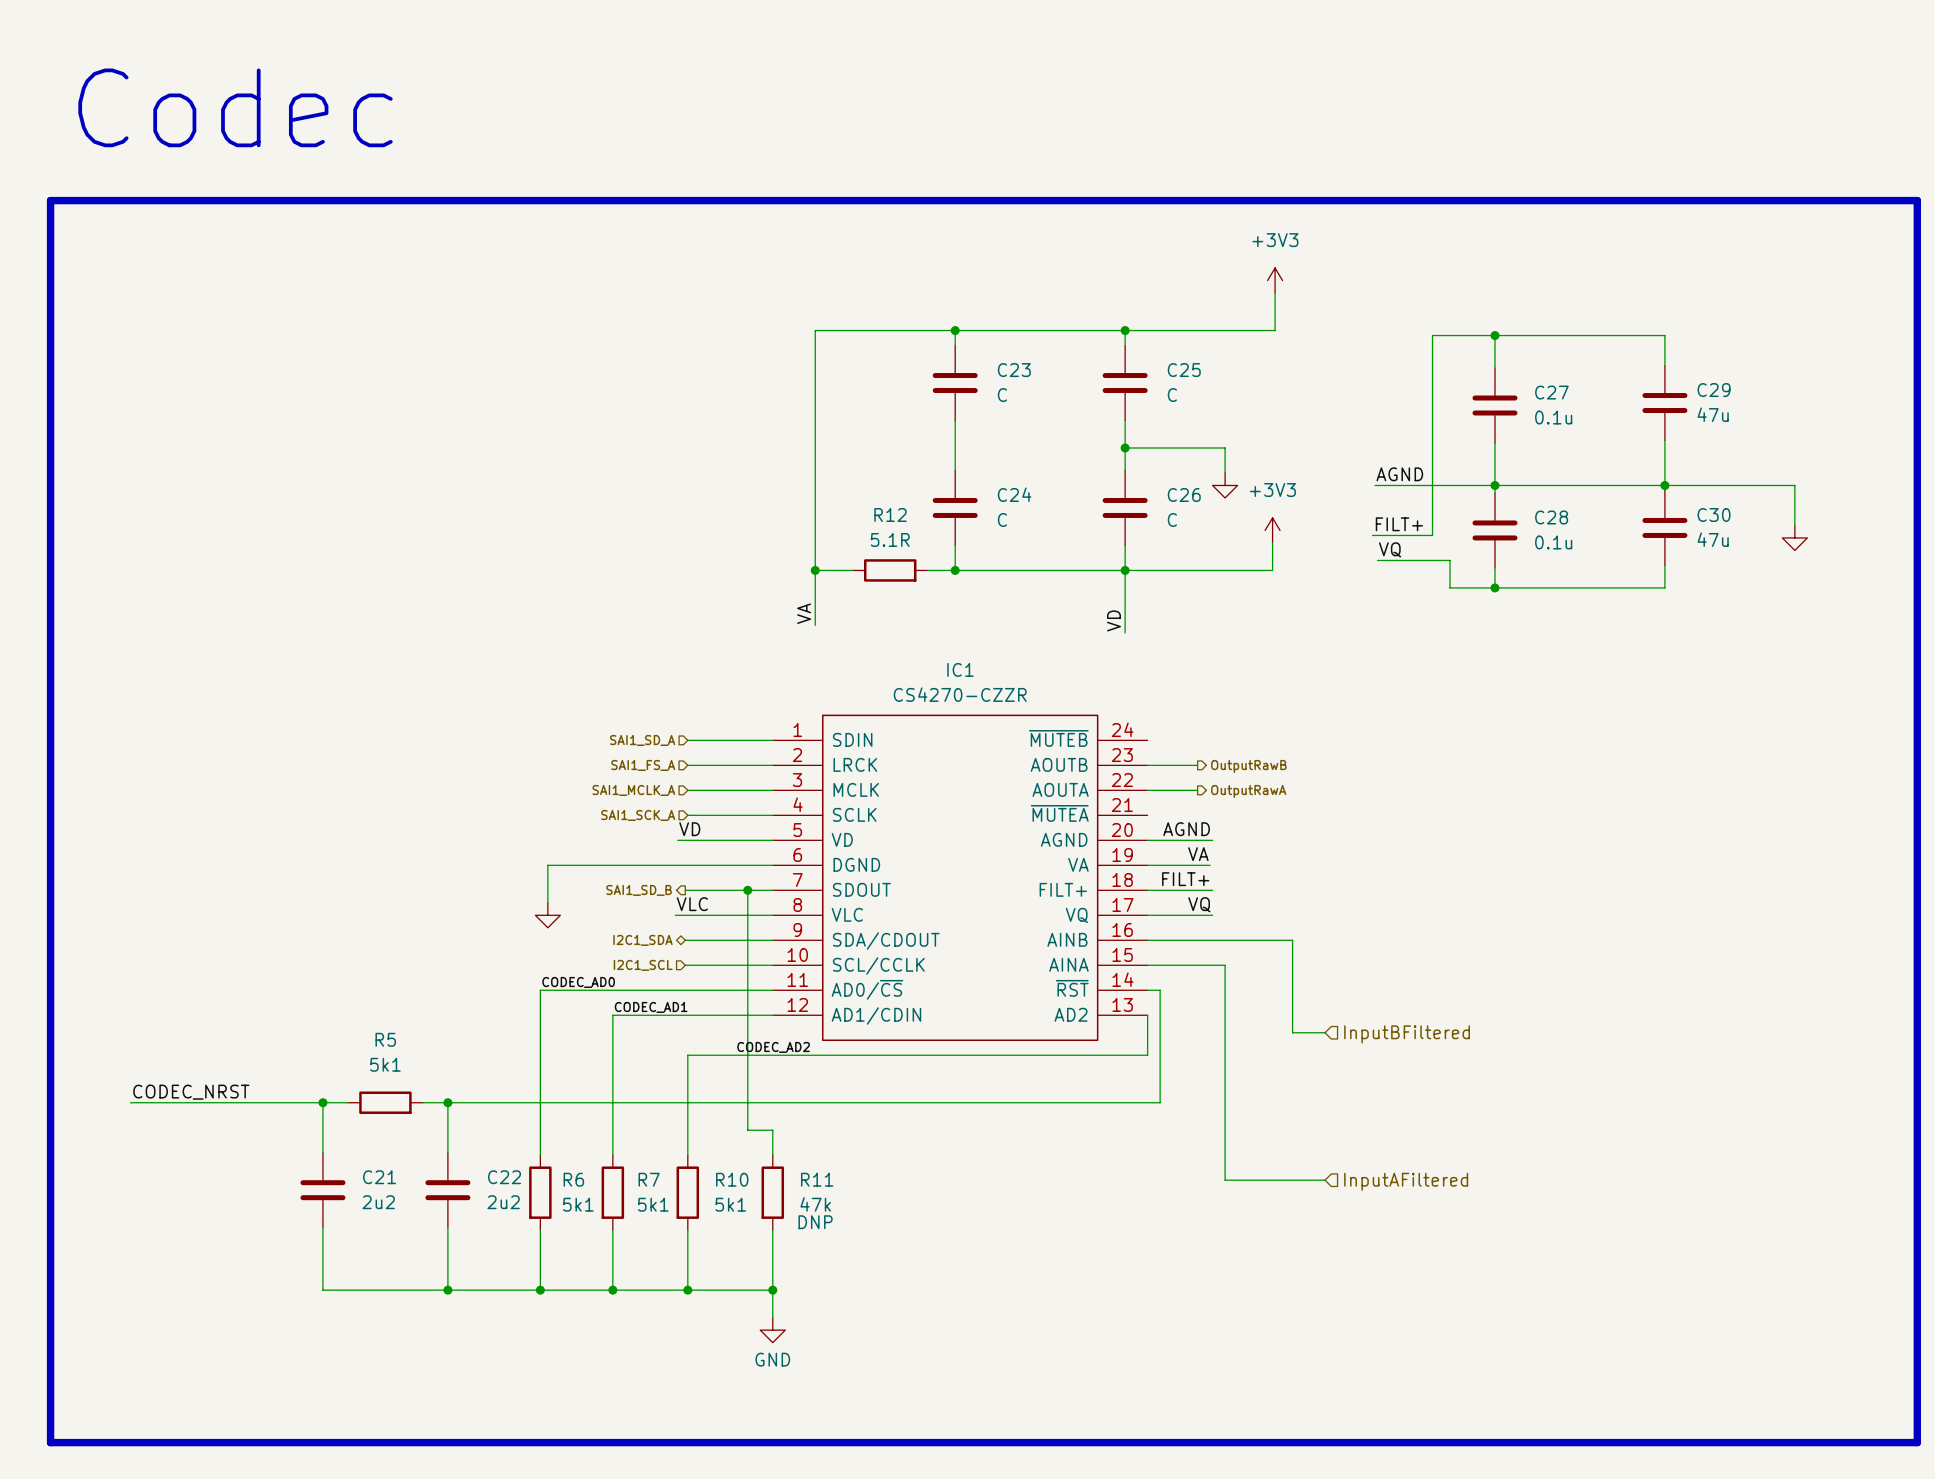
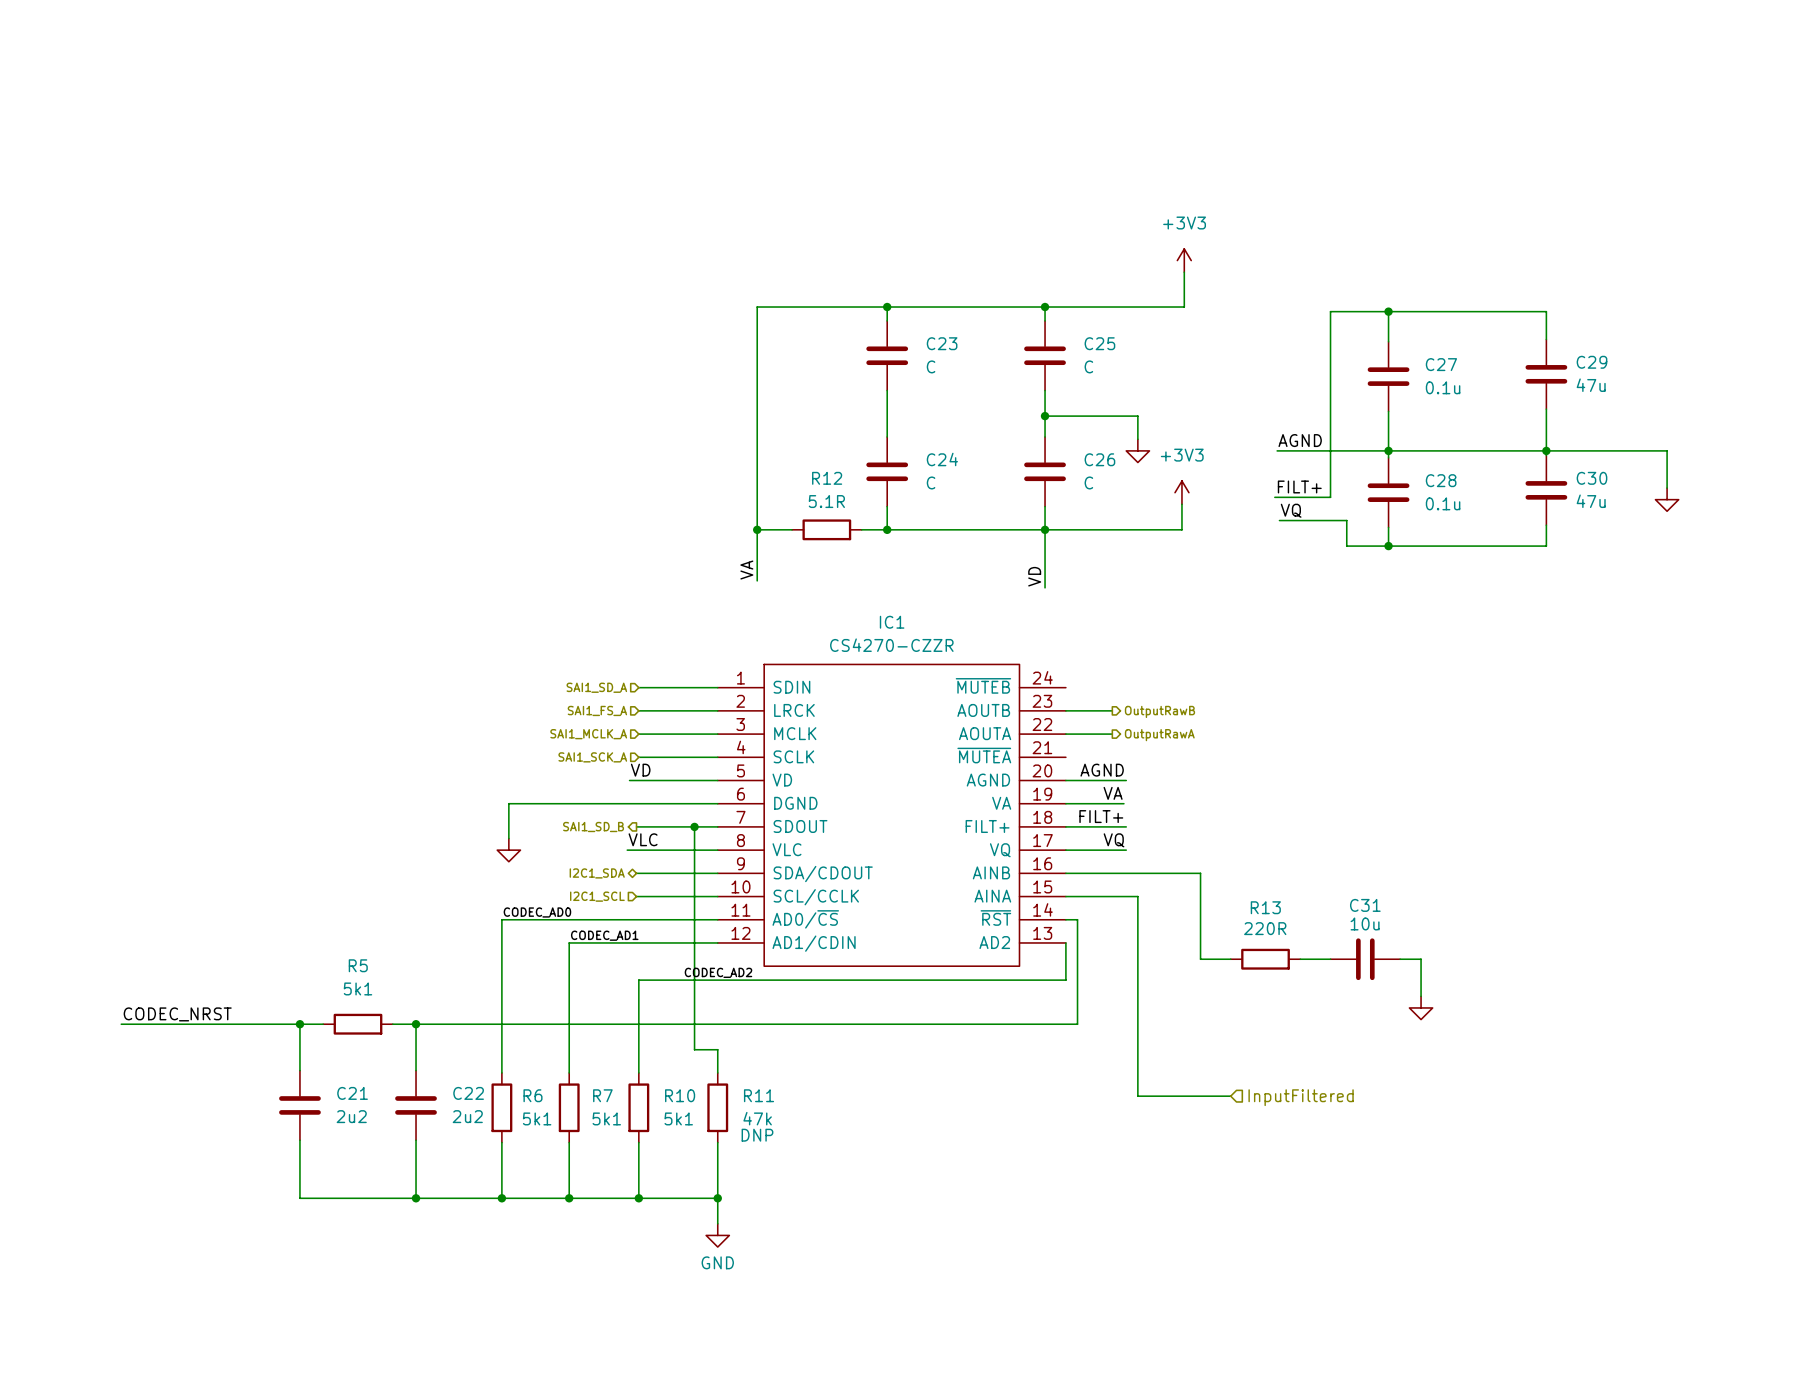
text: Codec (235, 107) -> none
line: (50, 200) (1917, 200) (1917, 1442) (50, 1442) (50, 200) -> none
R13: none -> 220R (1265, 959)
wire: none -> (1300, 959) (1330, 959)
C31: none -> 10u (1365, 959)
wire: none -> (1400, 959) (1421, 959) (1421, 996)
hierarchical label: InputBFiltered (1407, 1034) -> none
power symbol: none -> (1421, 1007)
hierarchical label: InputAFiltered (1406, 1181) -> InputFiltered (1301, 1097)

